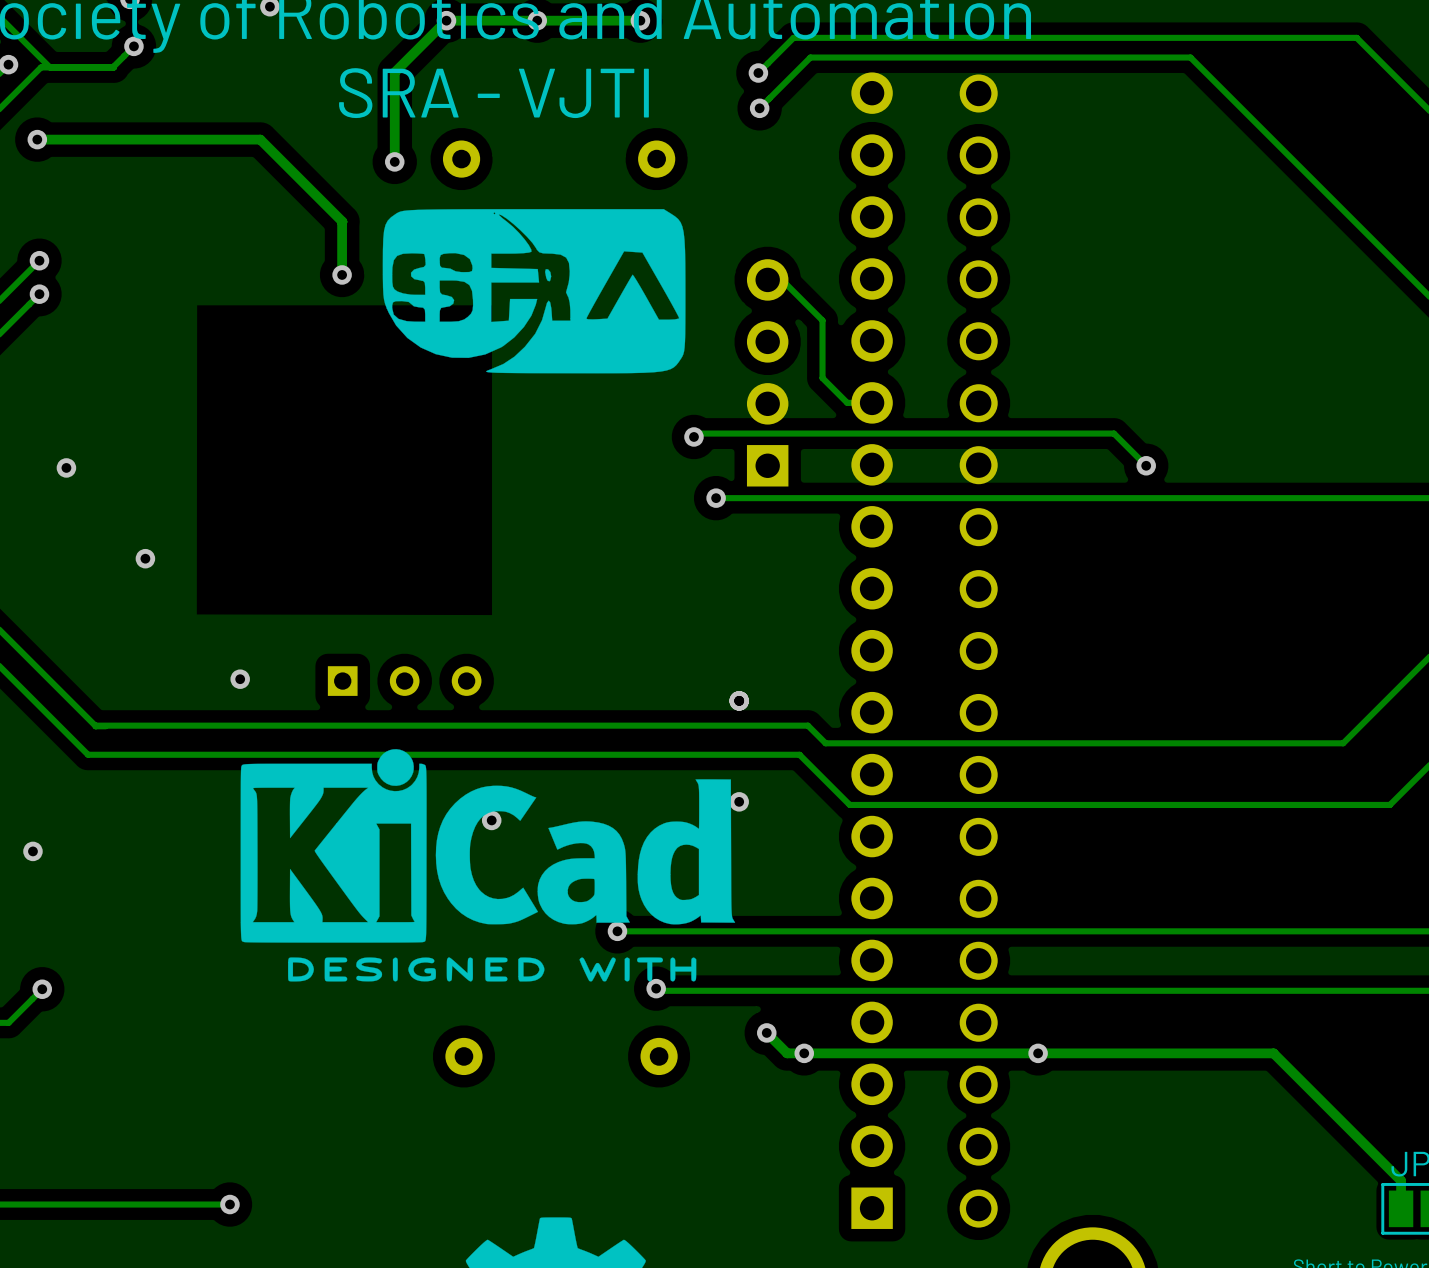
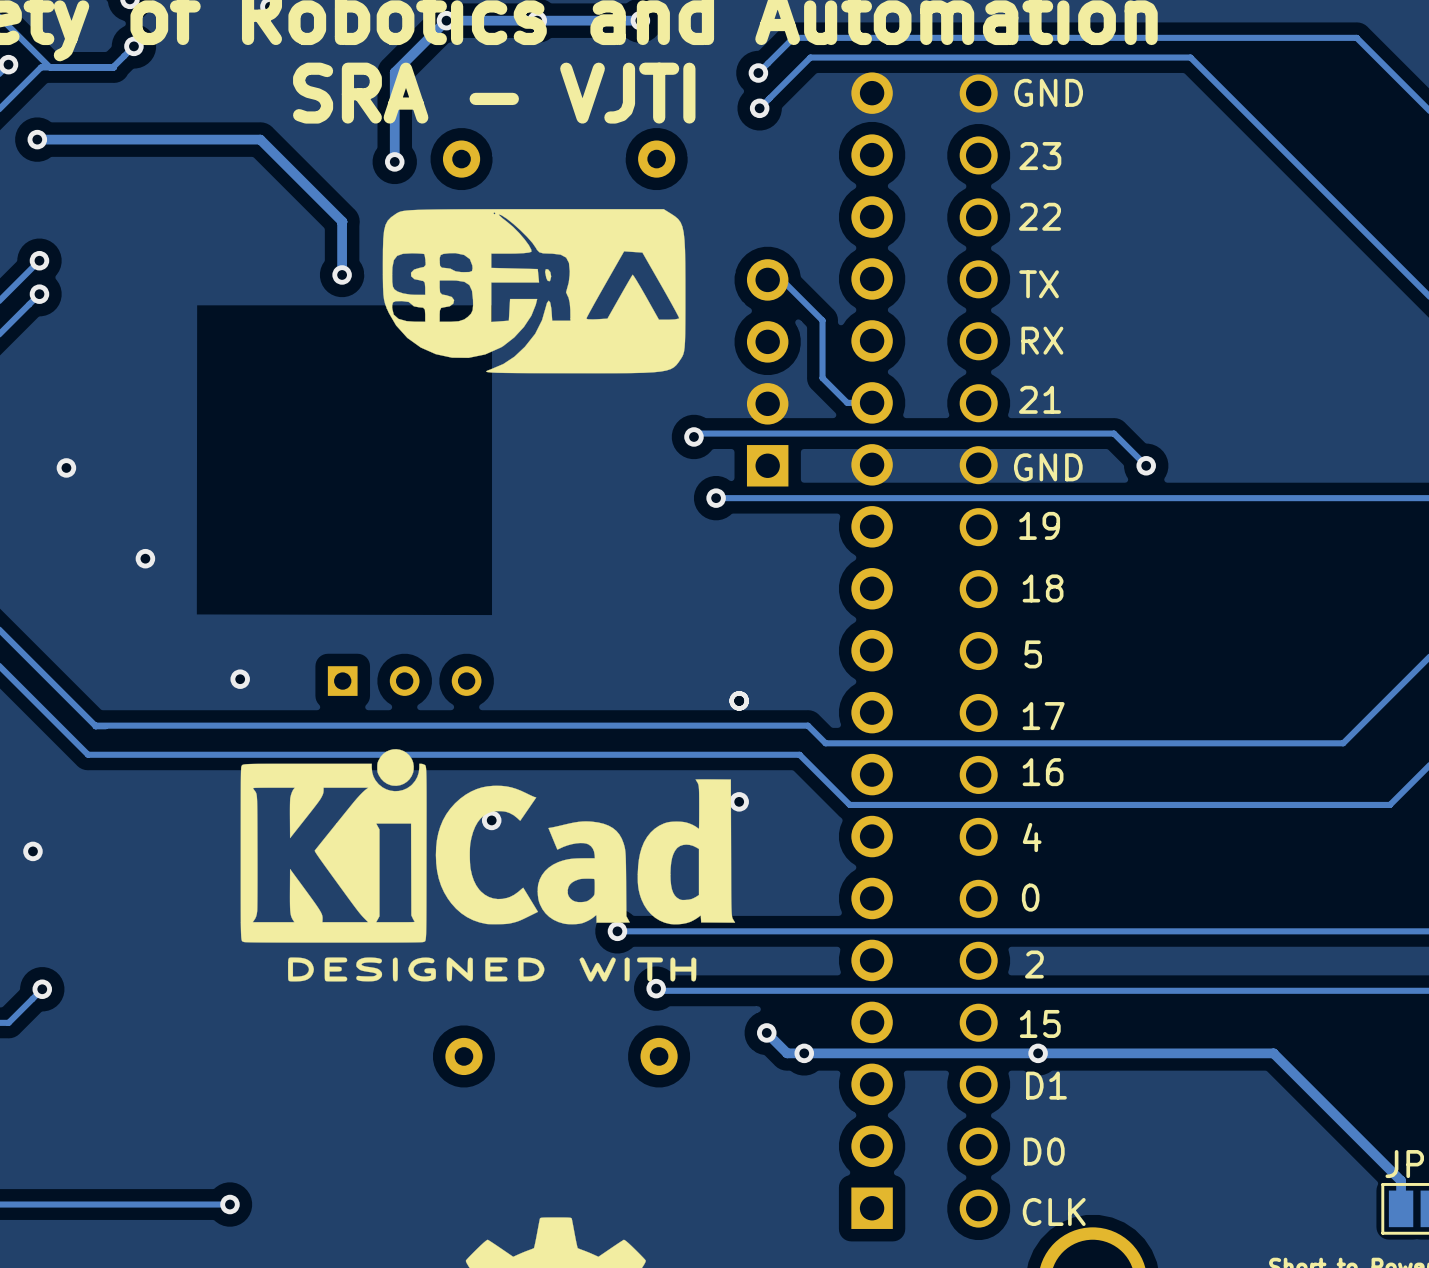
text: none -> GND (1048, 92)
text: none -> 23 (1040, 156)
text: none -> 22 (1040, 216)
text: none -> TX (1039, 284)
text: none -> RX (1042, 340)
text: none -> 21 (1040, 399)
text: none -> GND (1048, 467)
text: none -> 19 (1039, 525)
text: none -> 18 (1043, 588)
text: none -> 5 (1033, 654)
text: none -> 17 (1043, 716)
text: none -> 16 (1043, 772)
text: none -> 4 (1032, 837)
text: none -> 0 (1030, 897)
text: none -> 2 (1034, 964)
text: none -> 15 (1040, 1023)
text: none -> D1 (1046, 1085)
text: none -> D0 (1044, 1151)
text: none -> CLK (1054, 1211)

